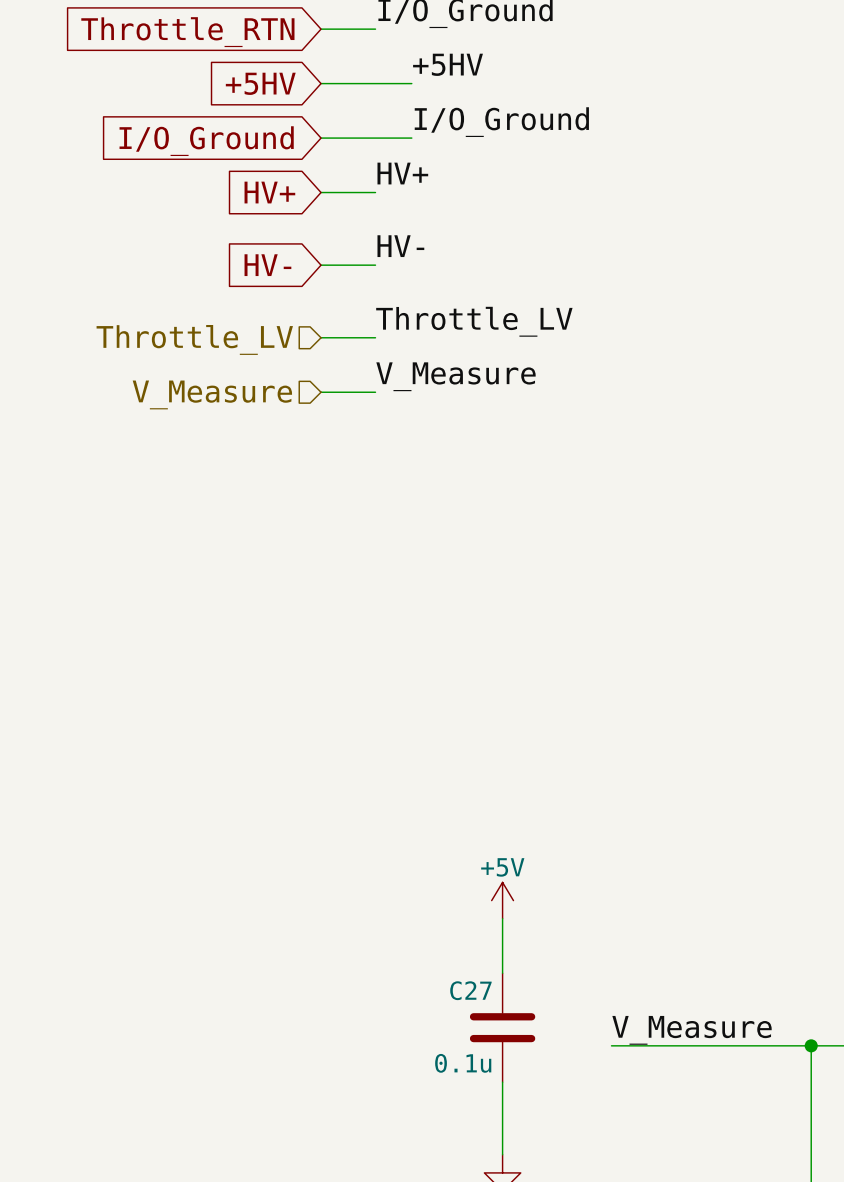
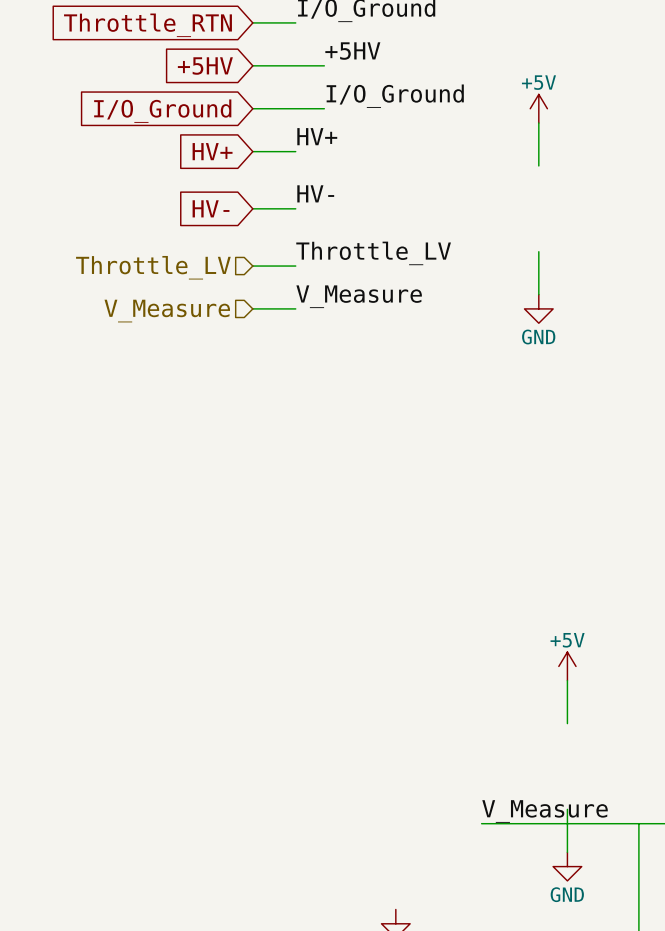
power symbol: none -> +5V (538, 108)
wire: none -> (538, 123) (538, 165)
wire: none -> (538, 251) (538, 294)
power symbol: none -> GND (538, 308)
power symbol: none -> +5V (567, 666)
power symbol: +5V (502, 900) -> none
wire: (502, 918) (502, 973) -> (567, 680) (567, 723)
C27: 0.1u (502, 1027) -> none
wire: none -> (567, 809) (567, 852)
junction: (811, 1045) -> none
wire: (502, 1082) (502, 1154) -> none
power symbol: none -> GND (567, 866)

